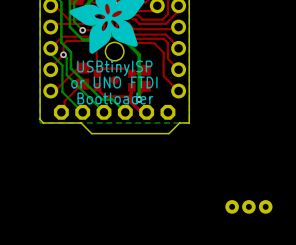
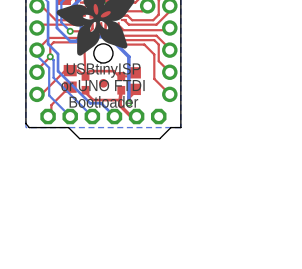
part: (248, 206) -> none

